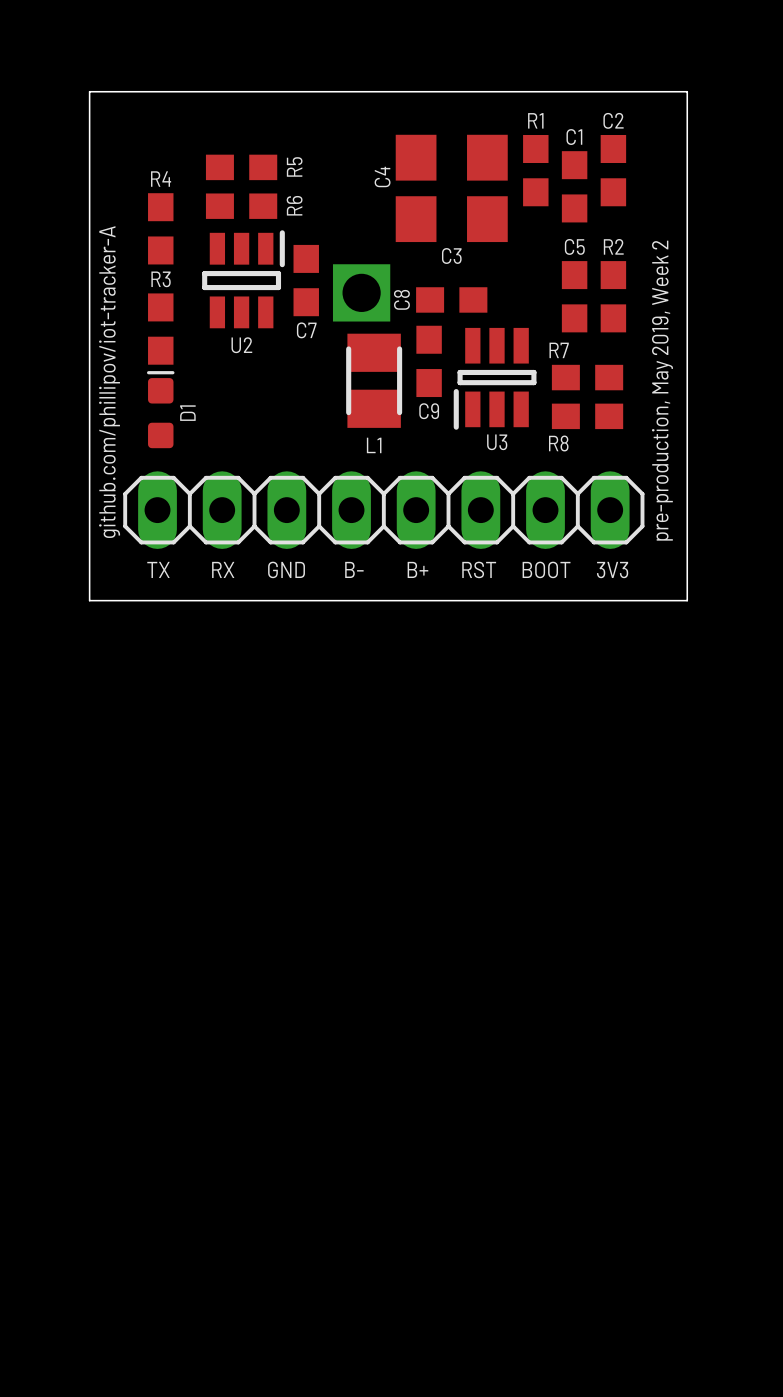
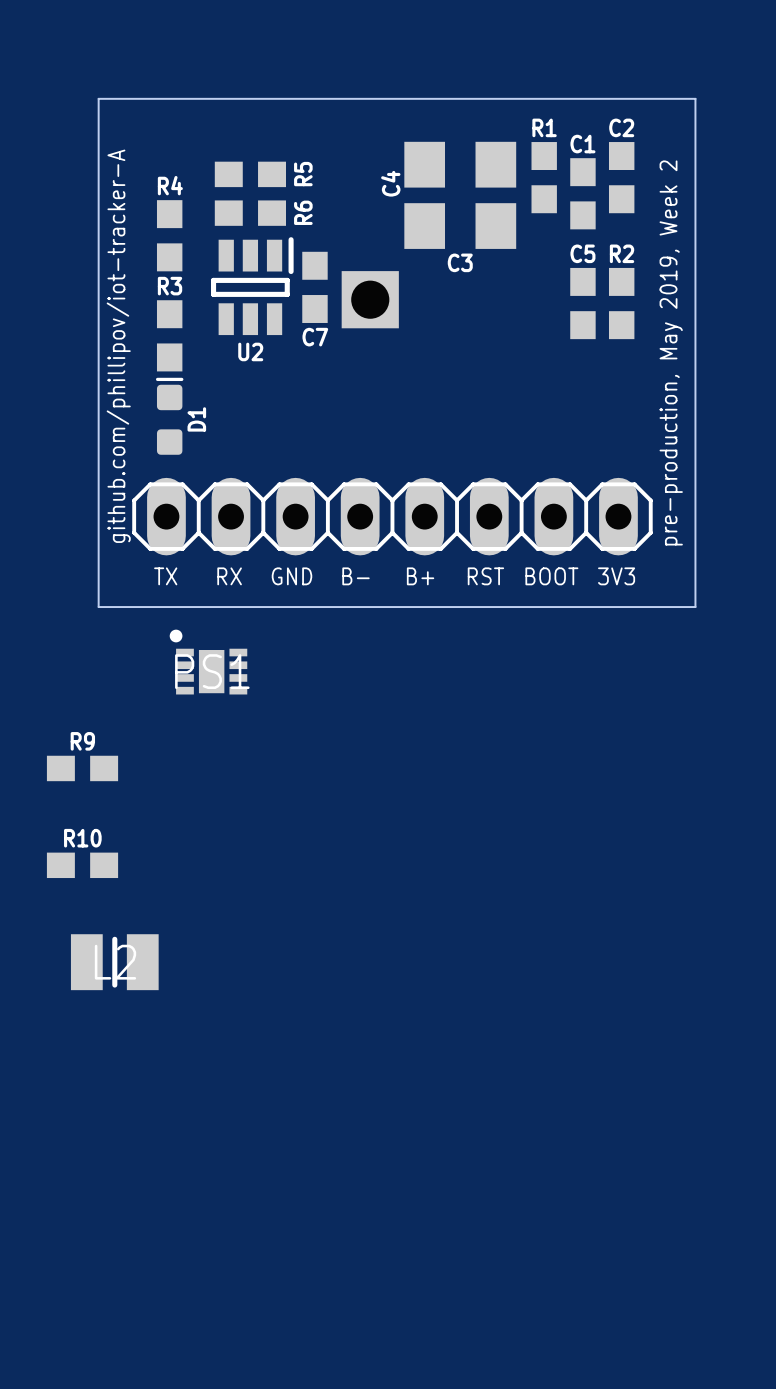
C8: (451, 299) -> none
C9: (429, 361) -> none
R7: (587, 377) -> none
U3: (495, 378) -> none
L1: (374, 380) -> none
R8: (587, 416) -> none
part: none -> (208, 662)
R9: none -> (82, 768)
R10: none -> (82, 865)
part: none -> (114, 962)

